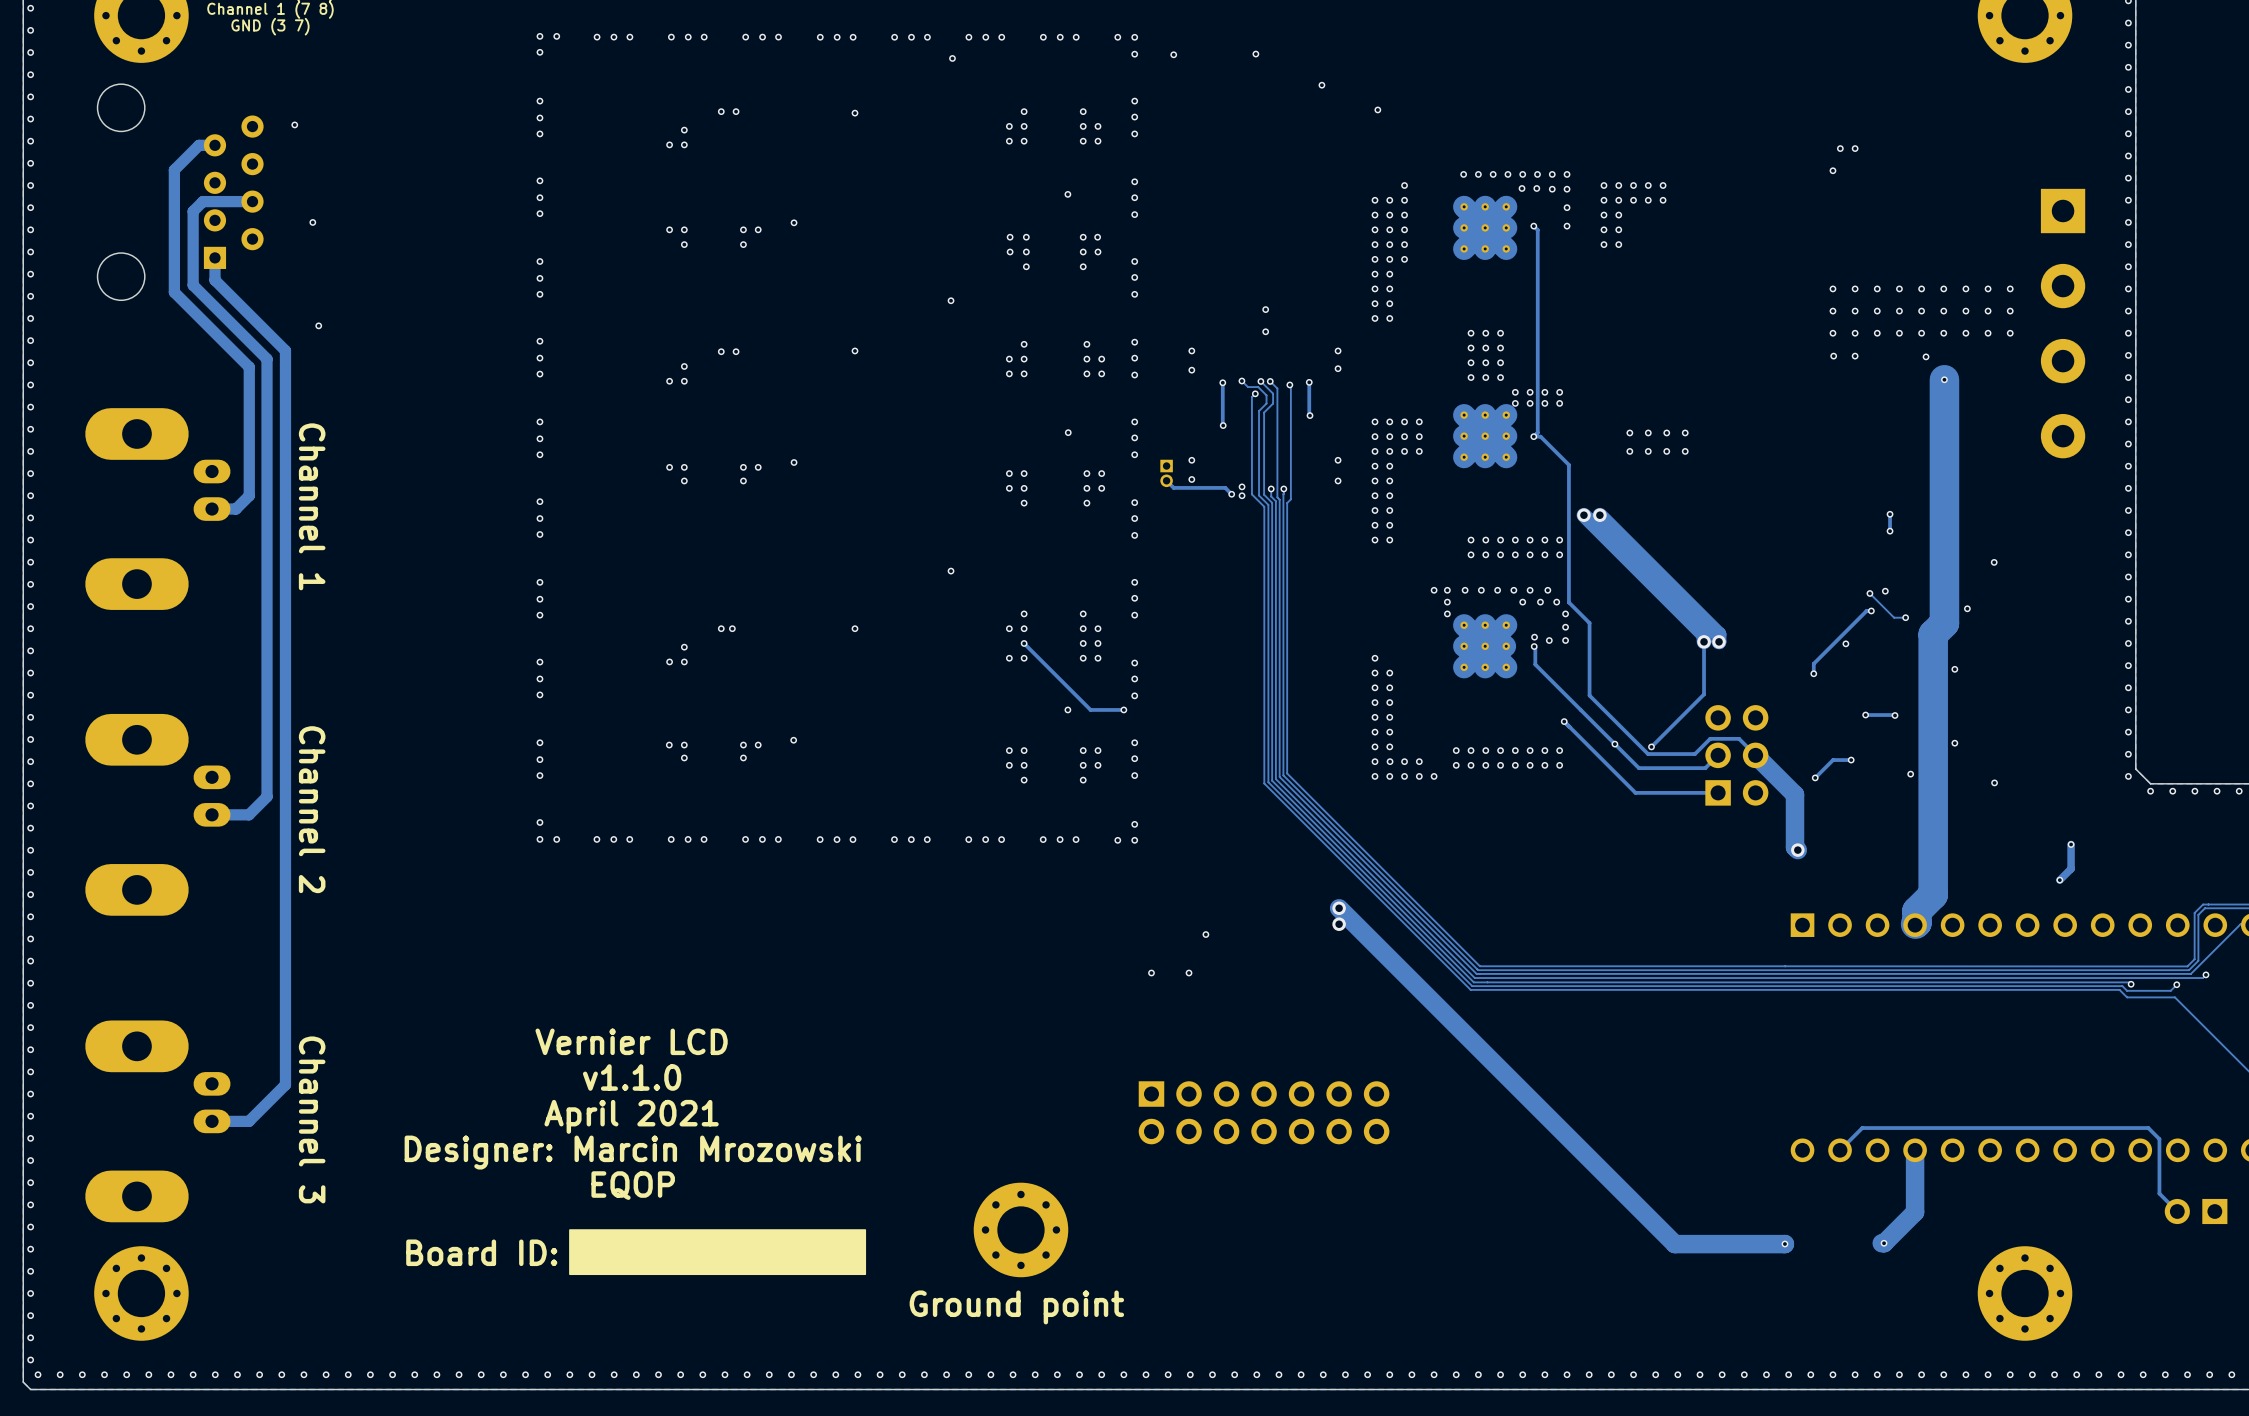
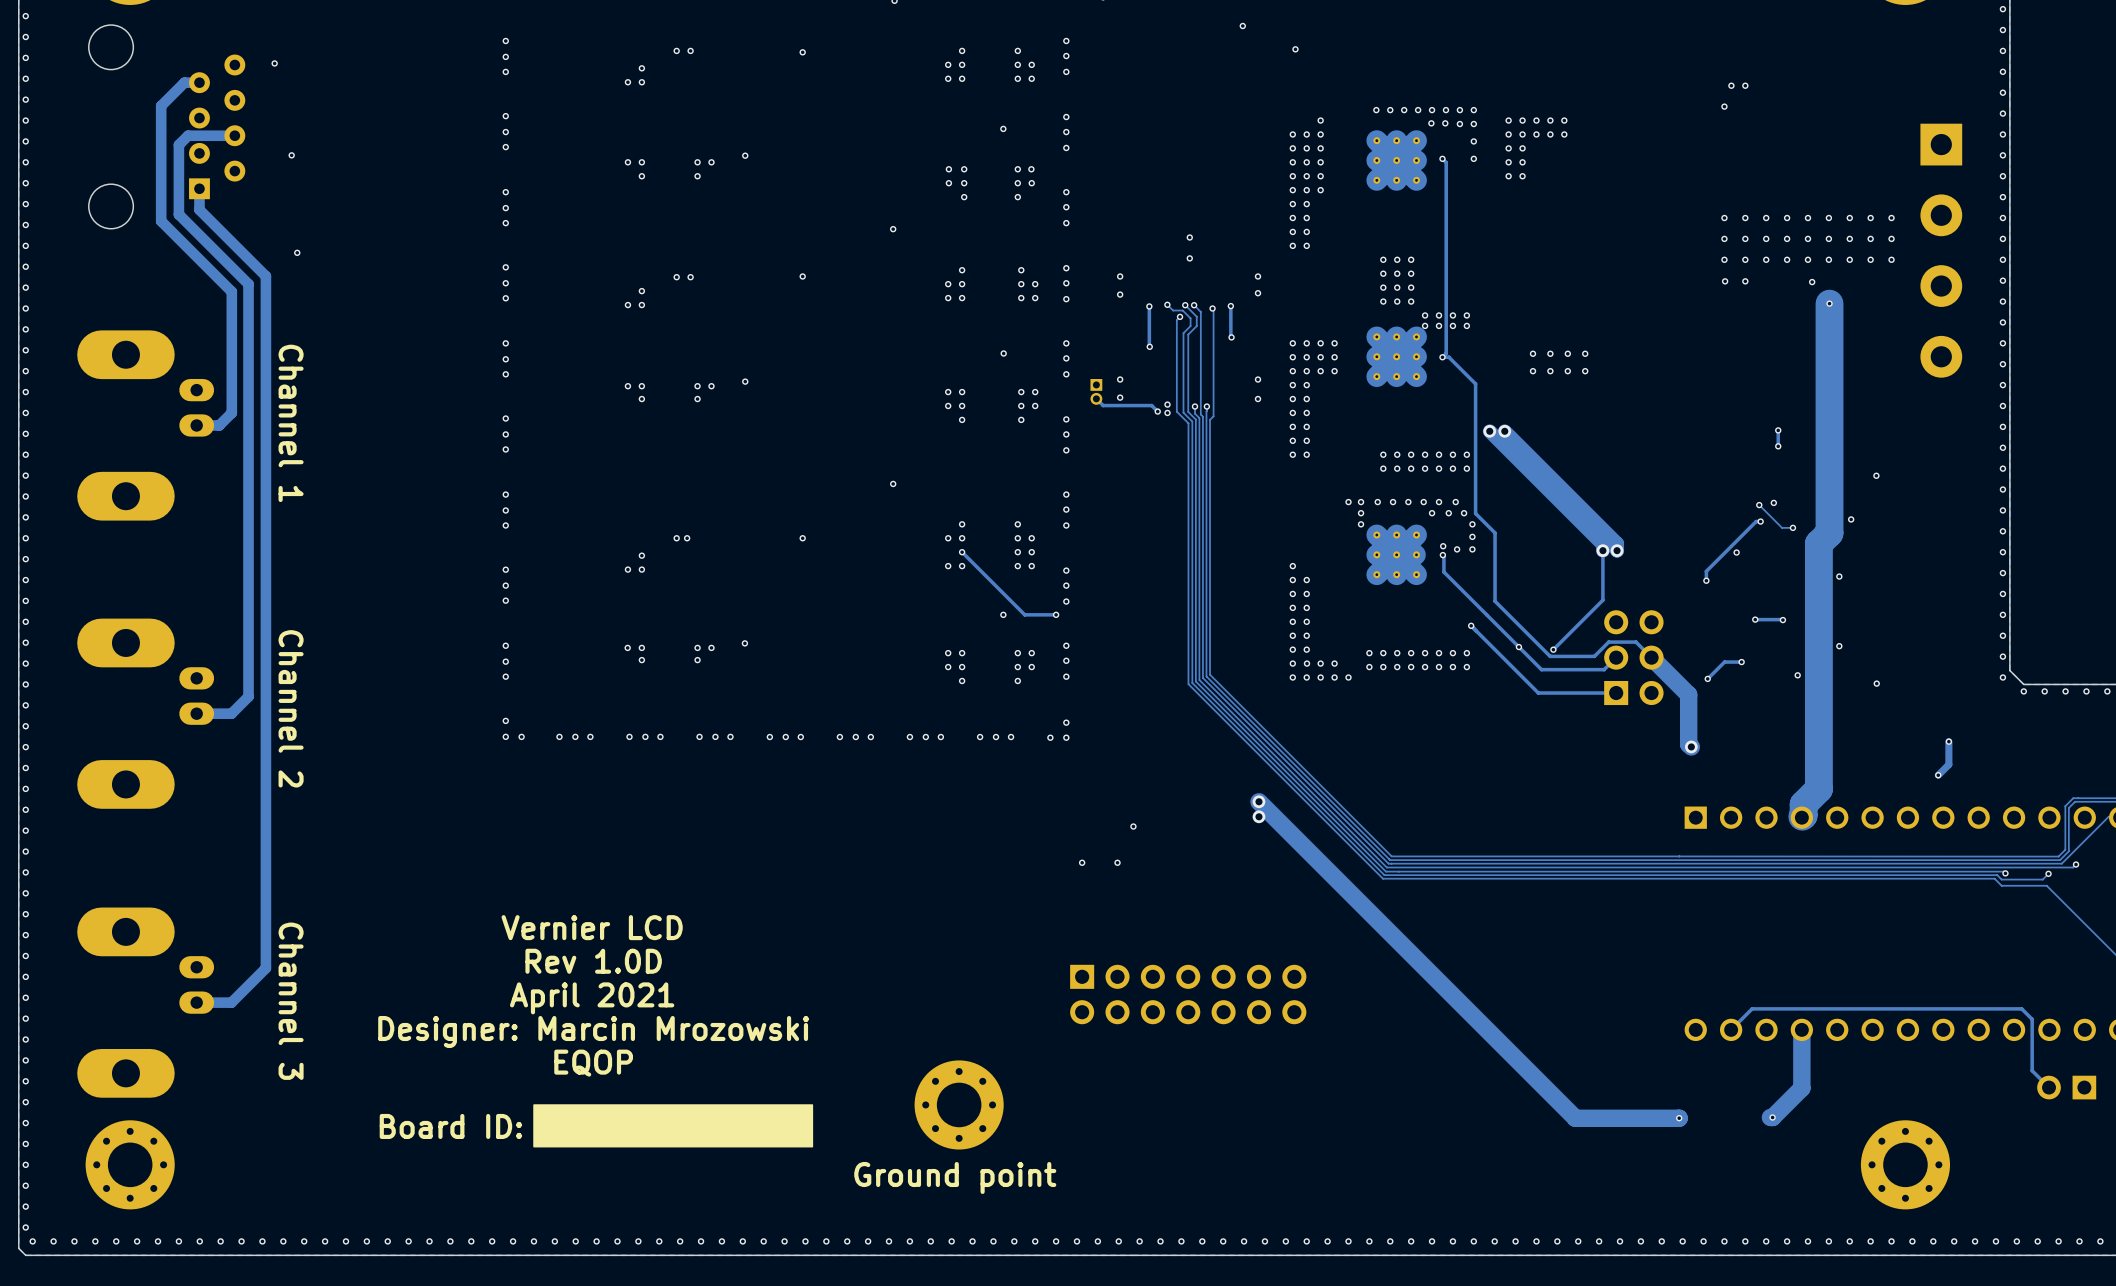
text: v1.1.0 (632, 1077) -> Rev 1.0D (593, 961)

